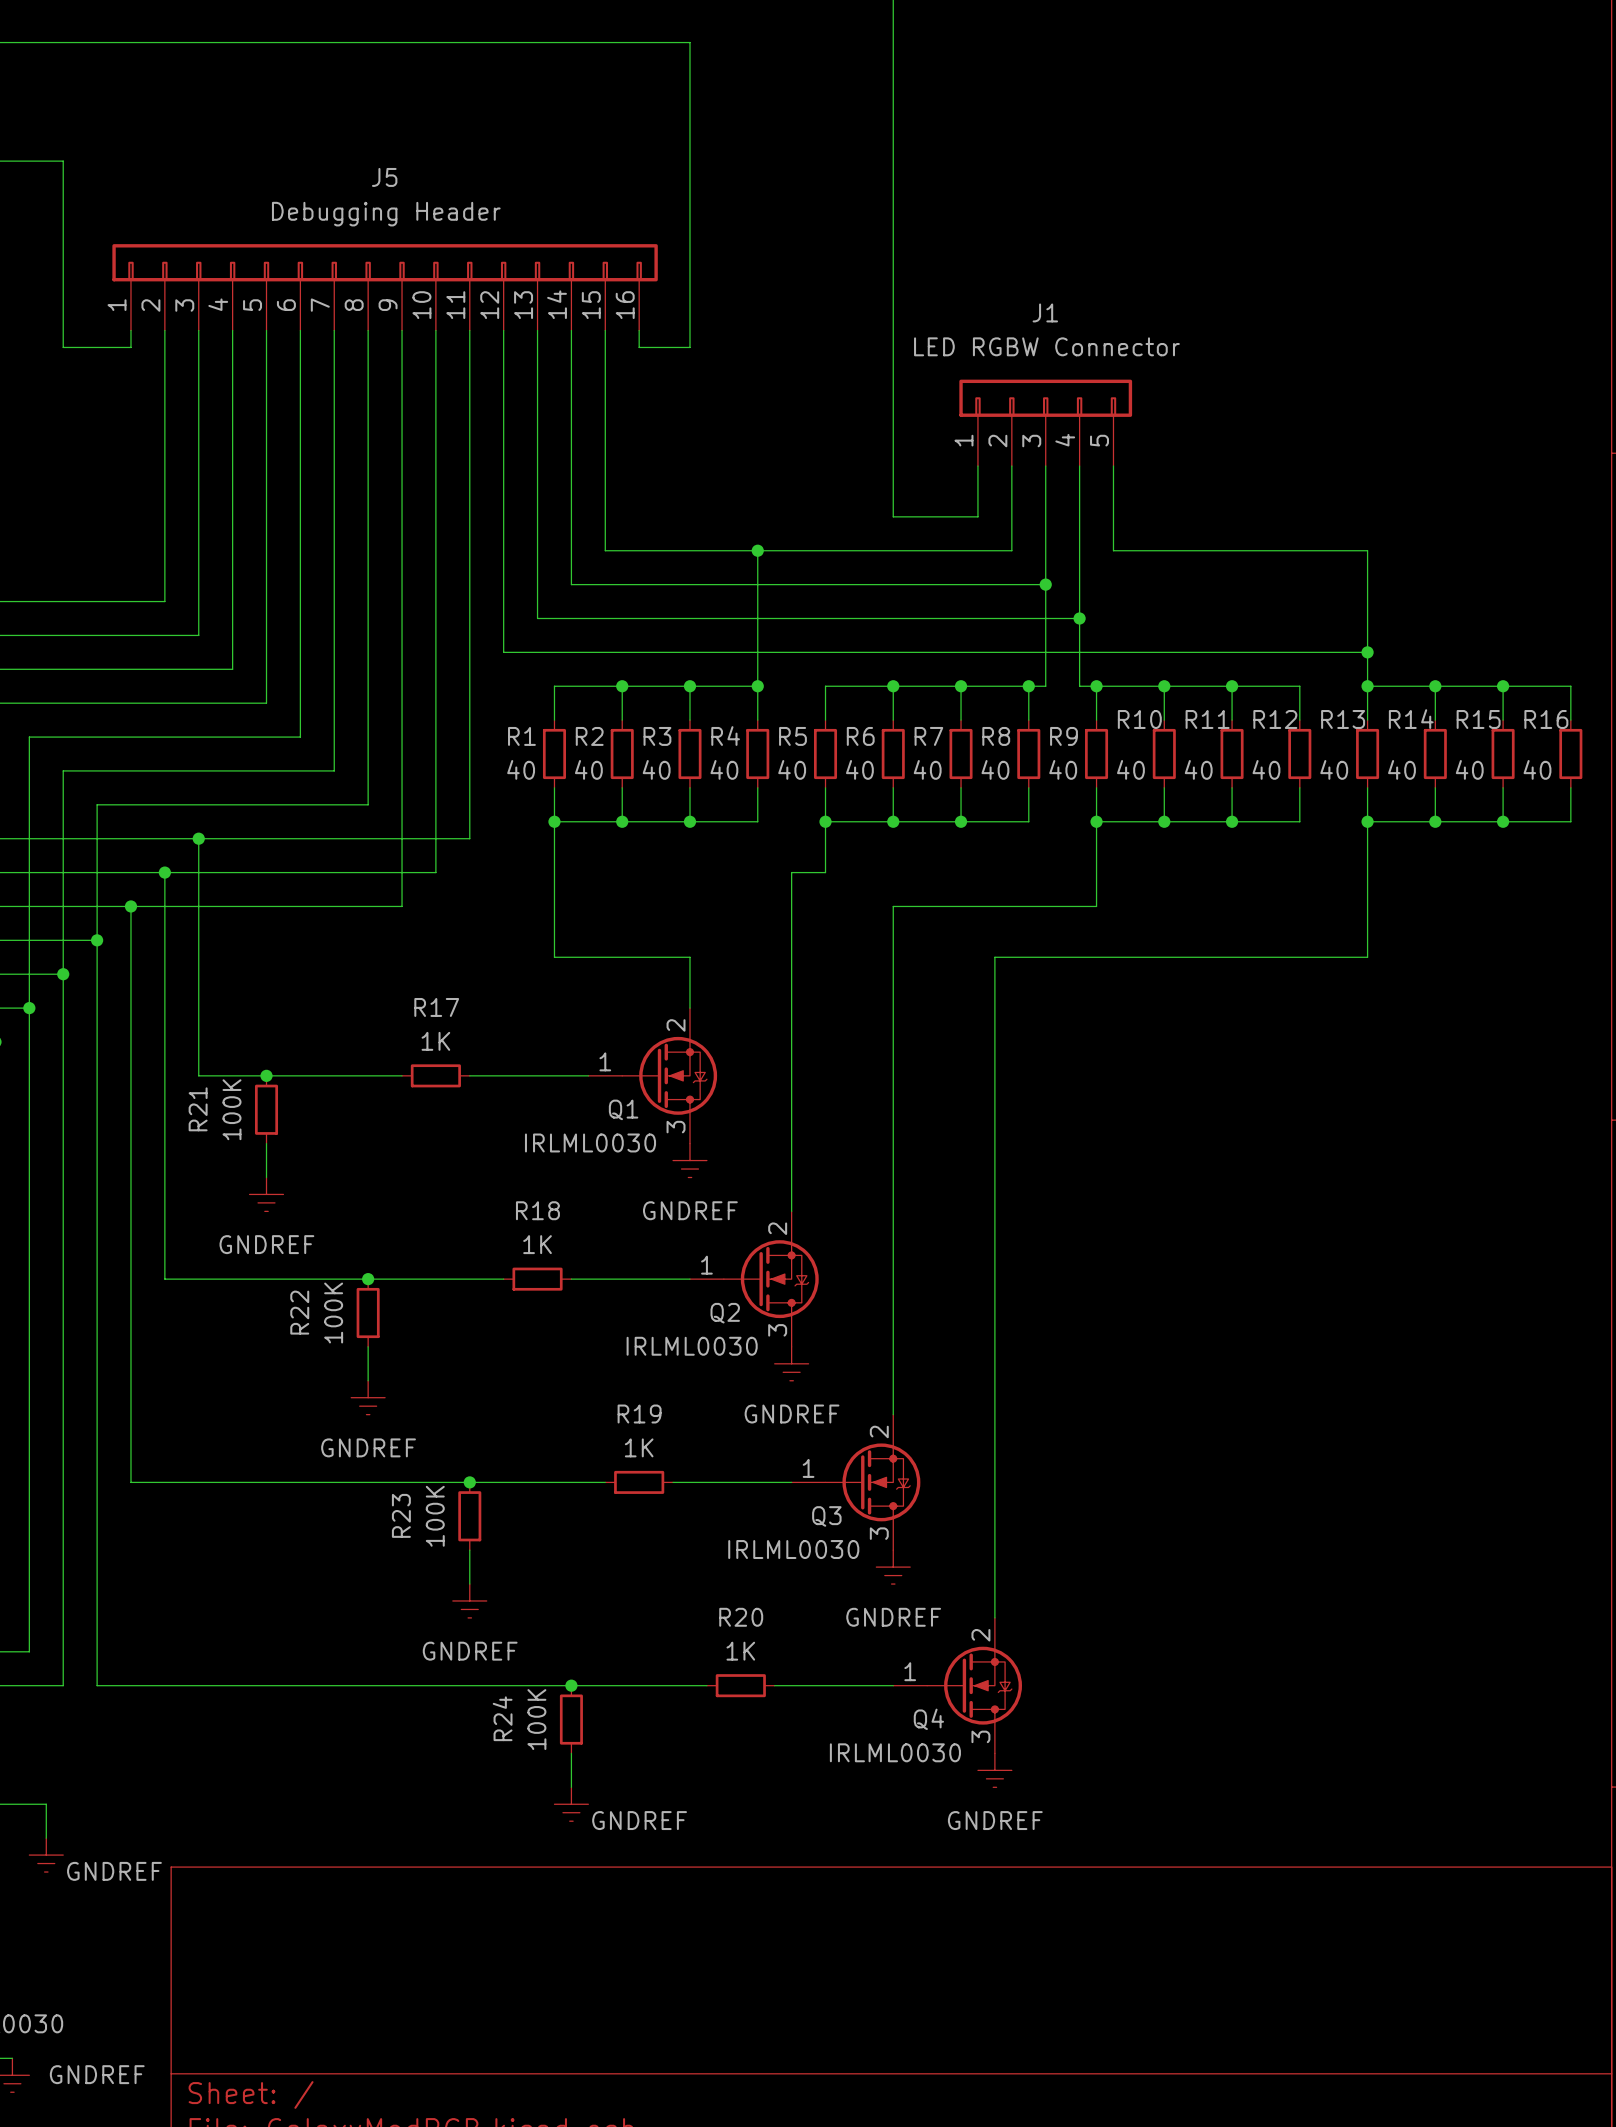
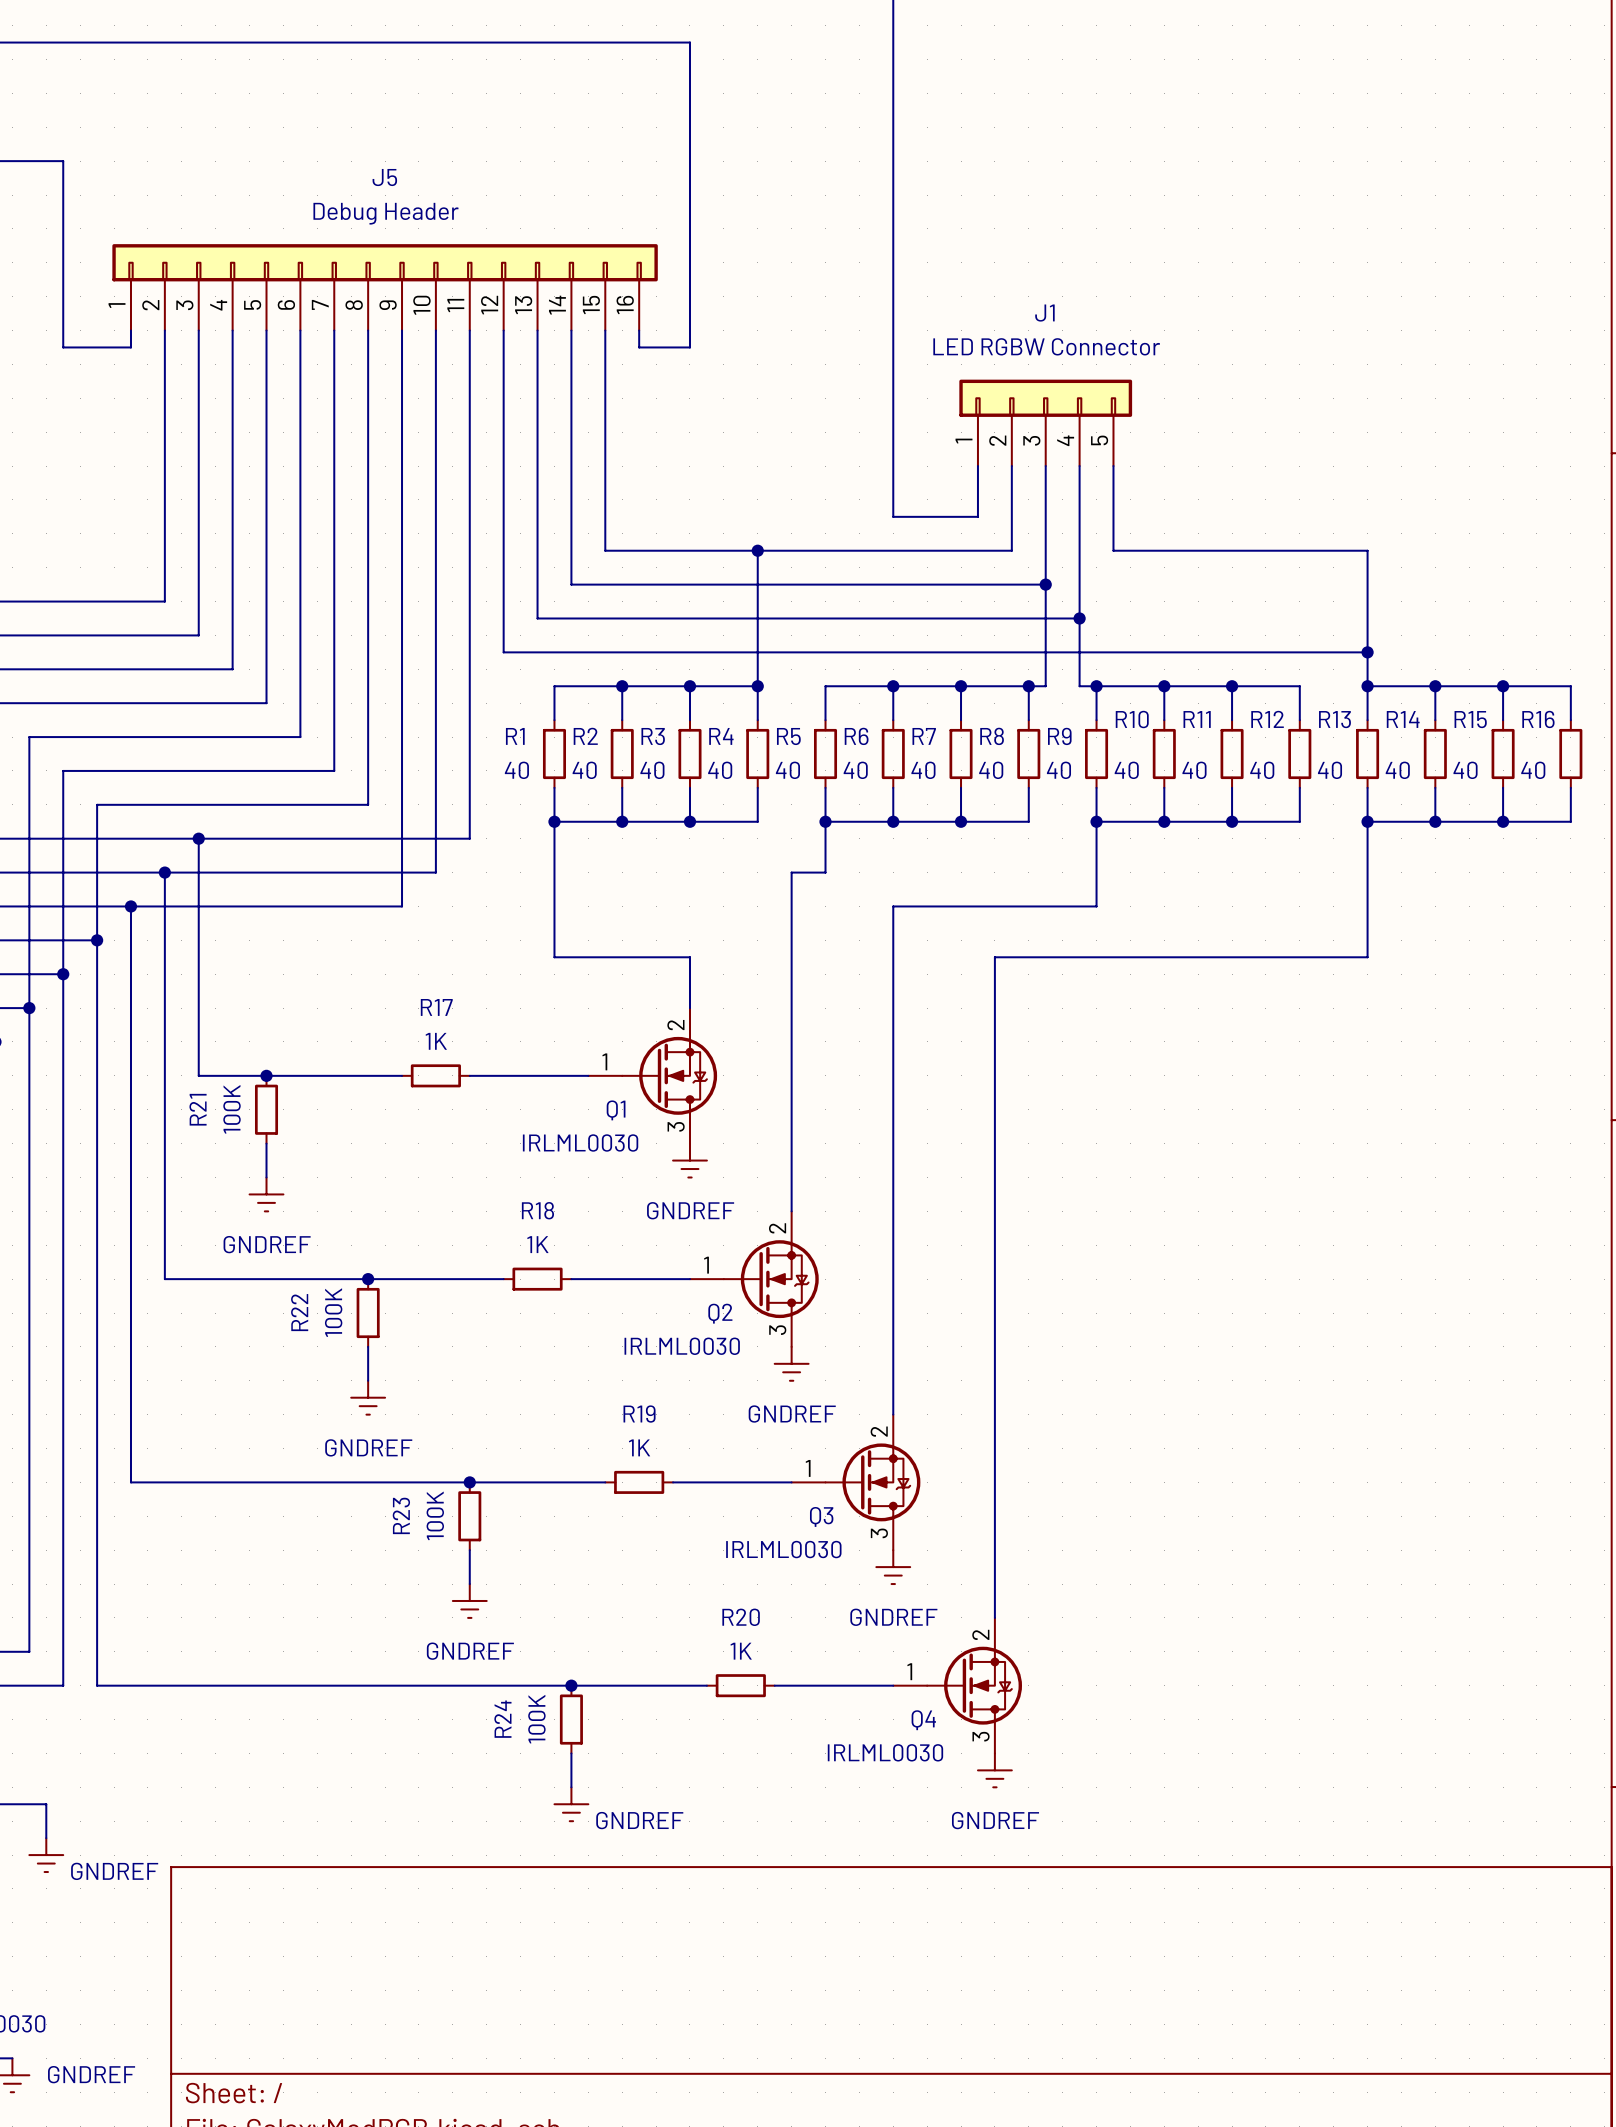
J5 value: Debugging Header (386, 214) -> Debug Header (386, 213)

